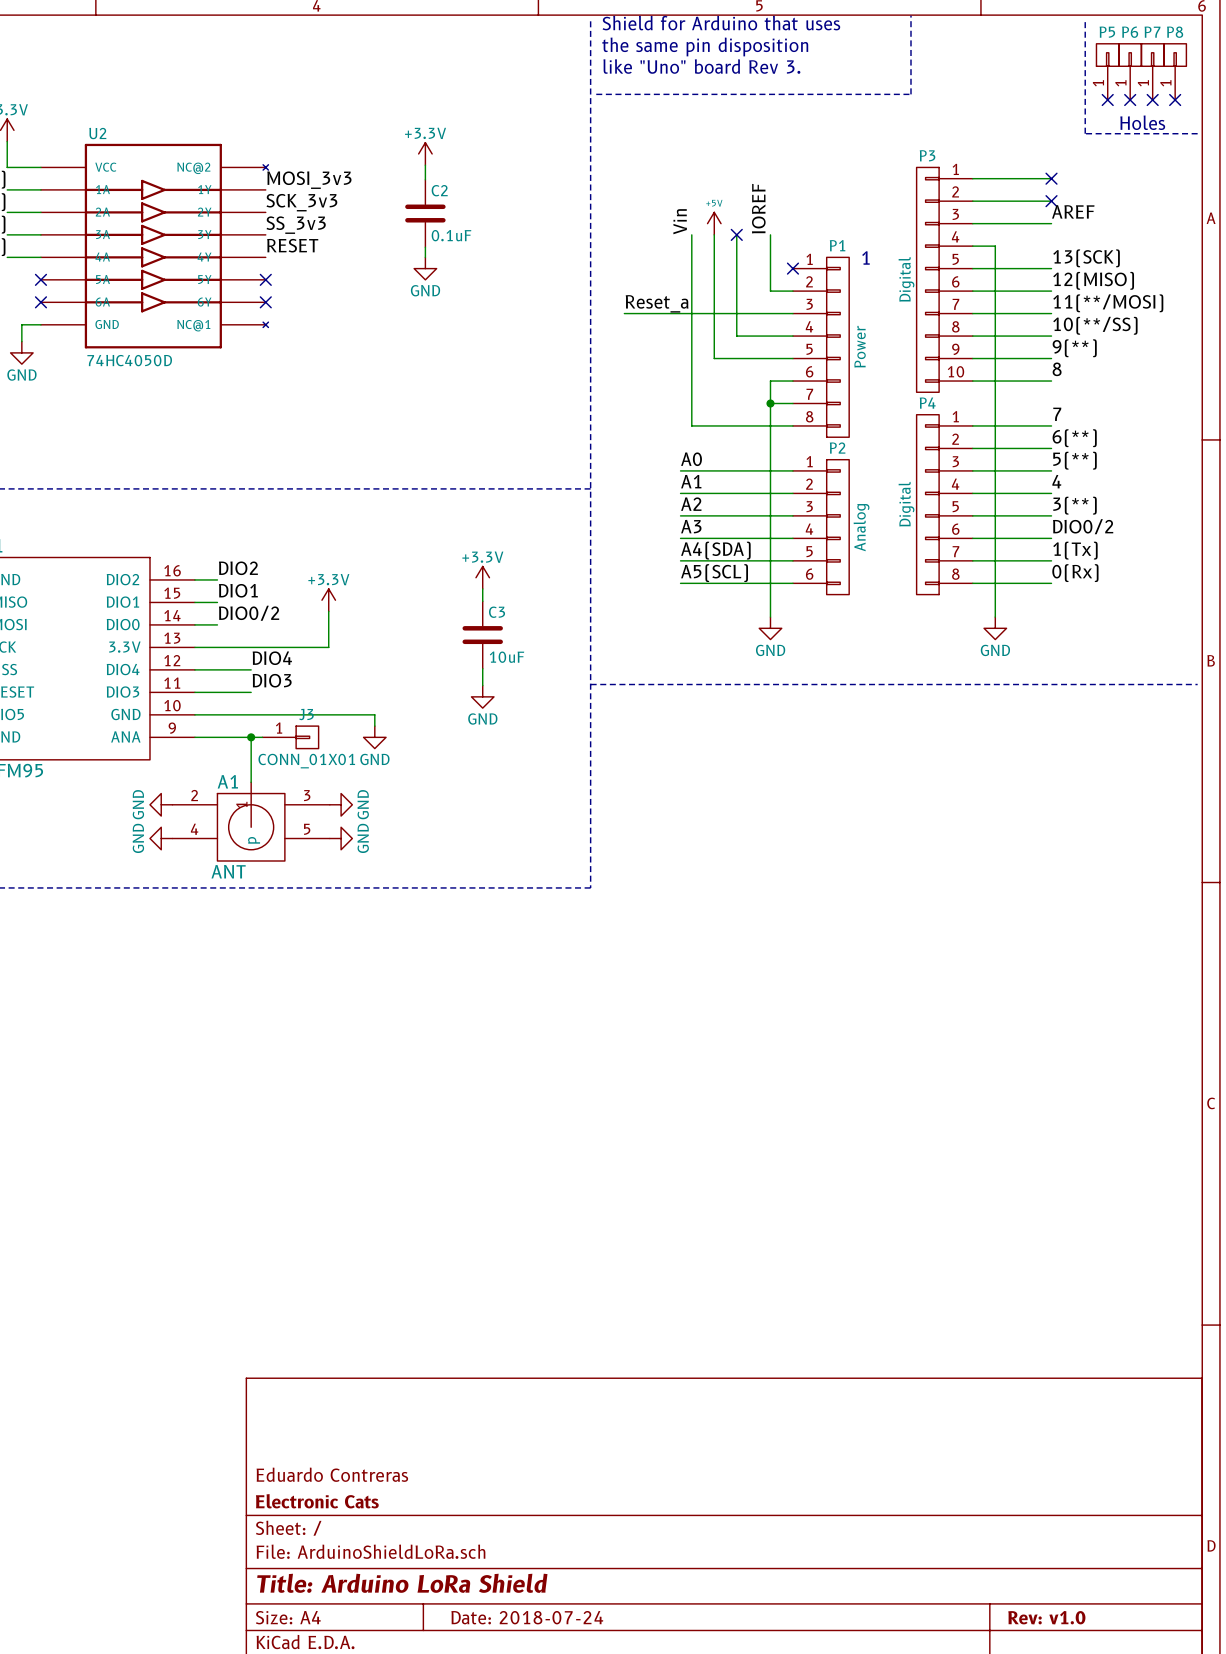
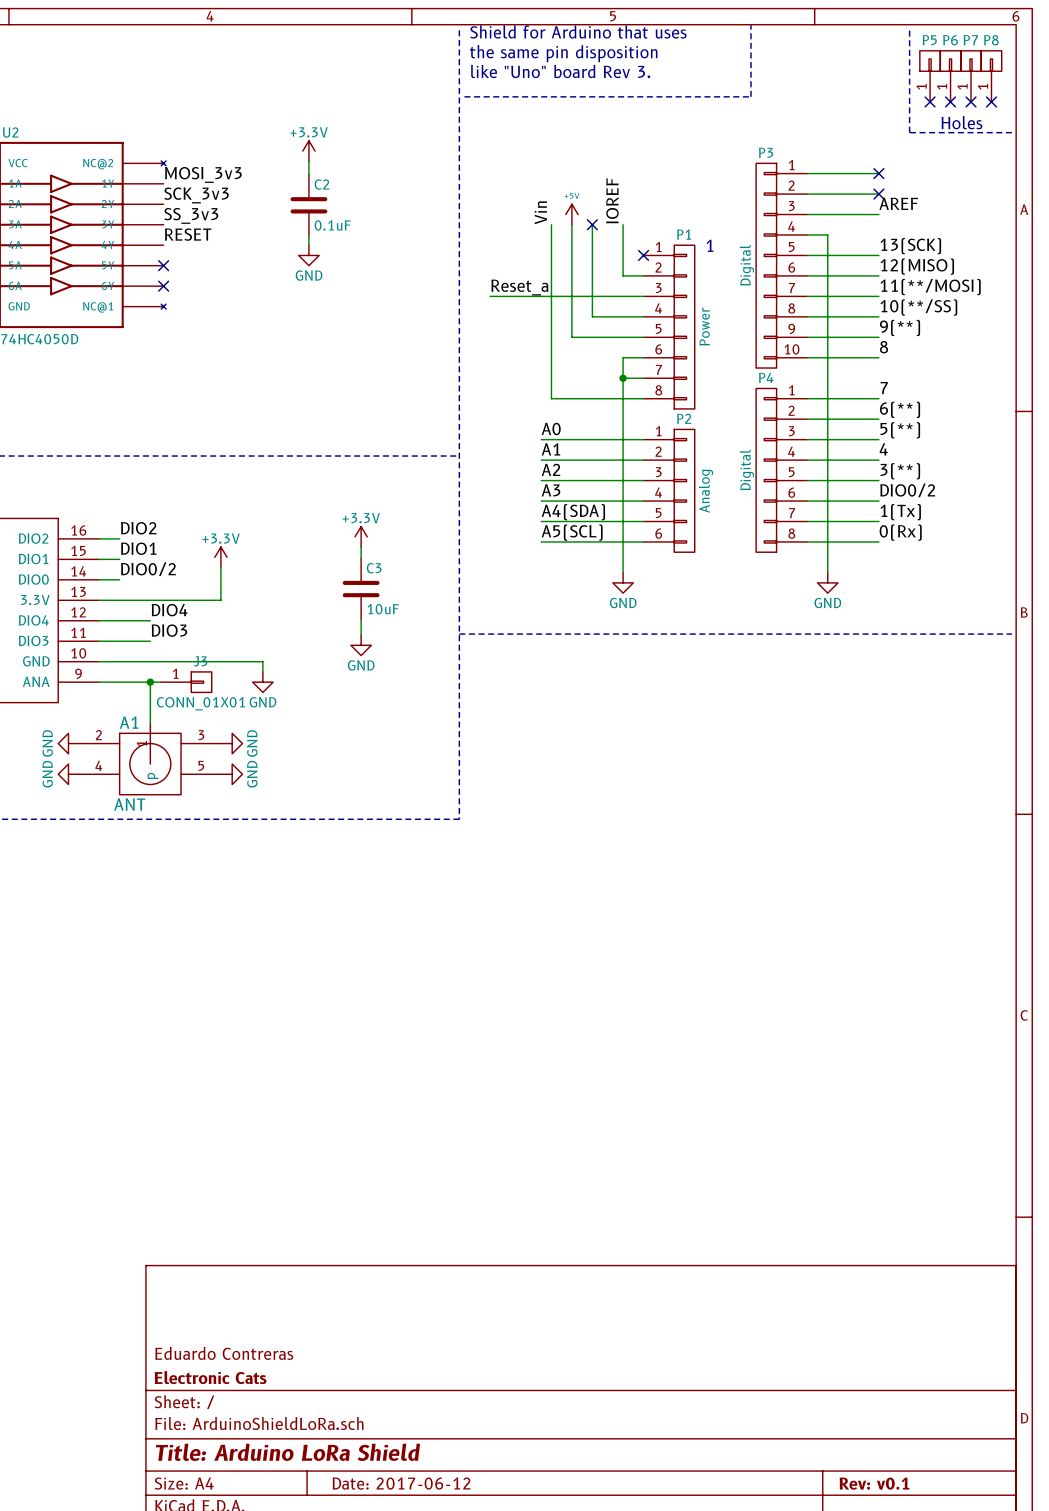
title block: Date: 2018-07-24 (527, 1617) -> Date: 2017-06-12 (401, 1483)
title block: Rev: v1.0 (1046, 1617) -> Rev: v0.1 (874, 1483)

